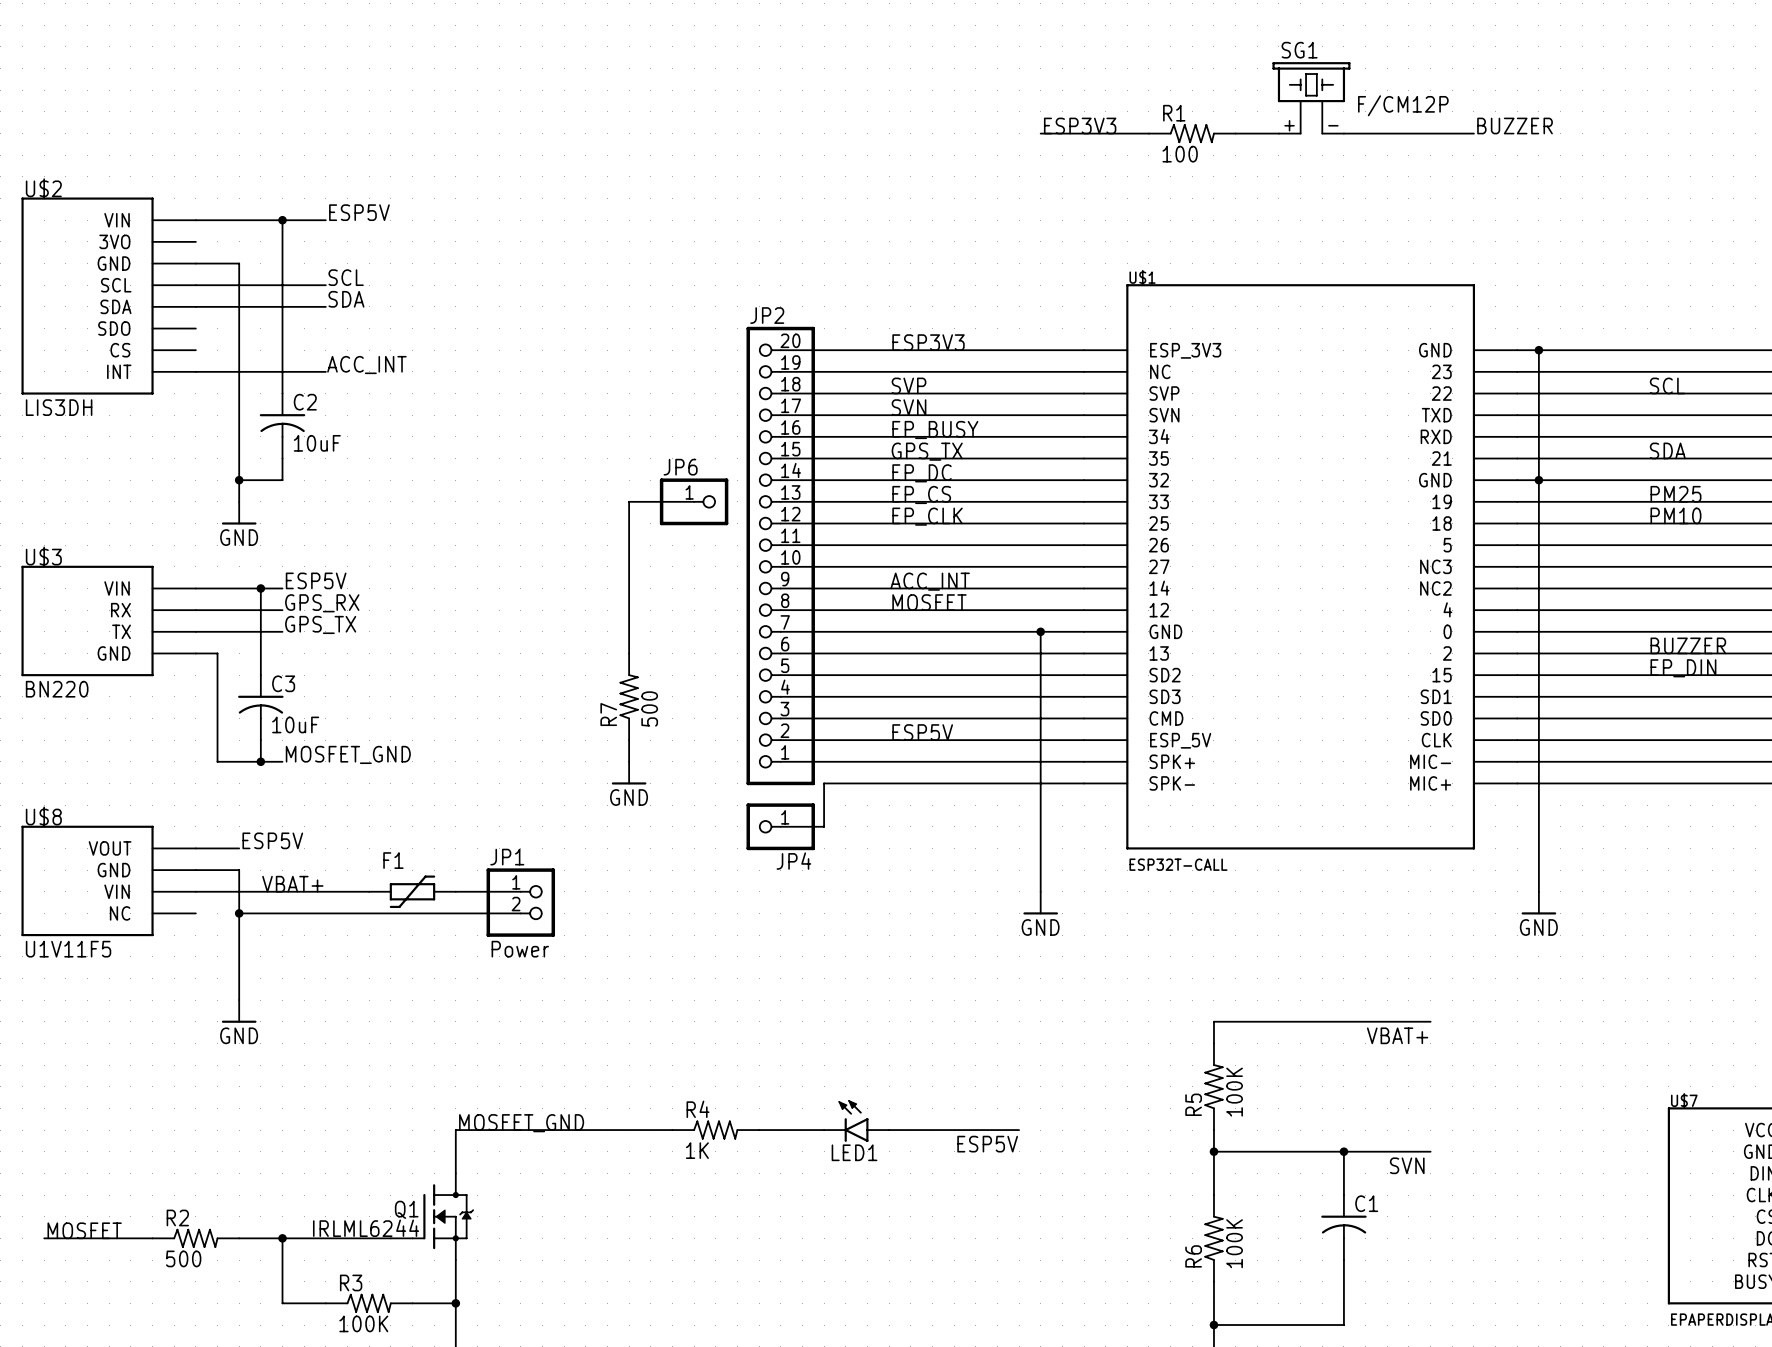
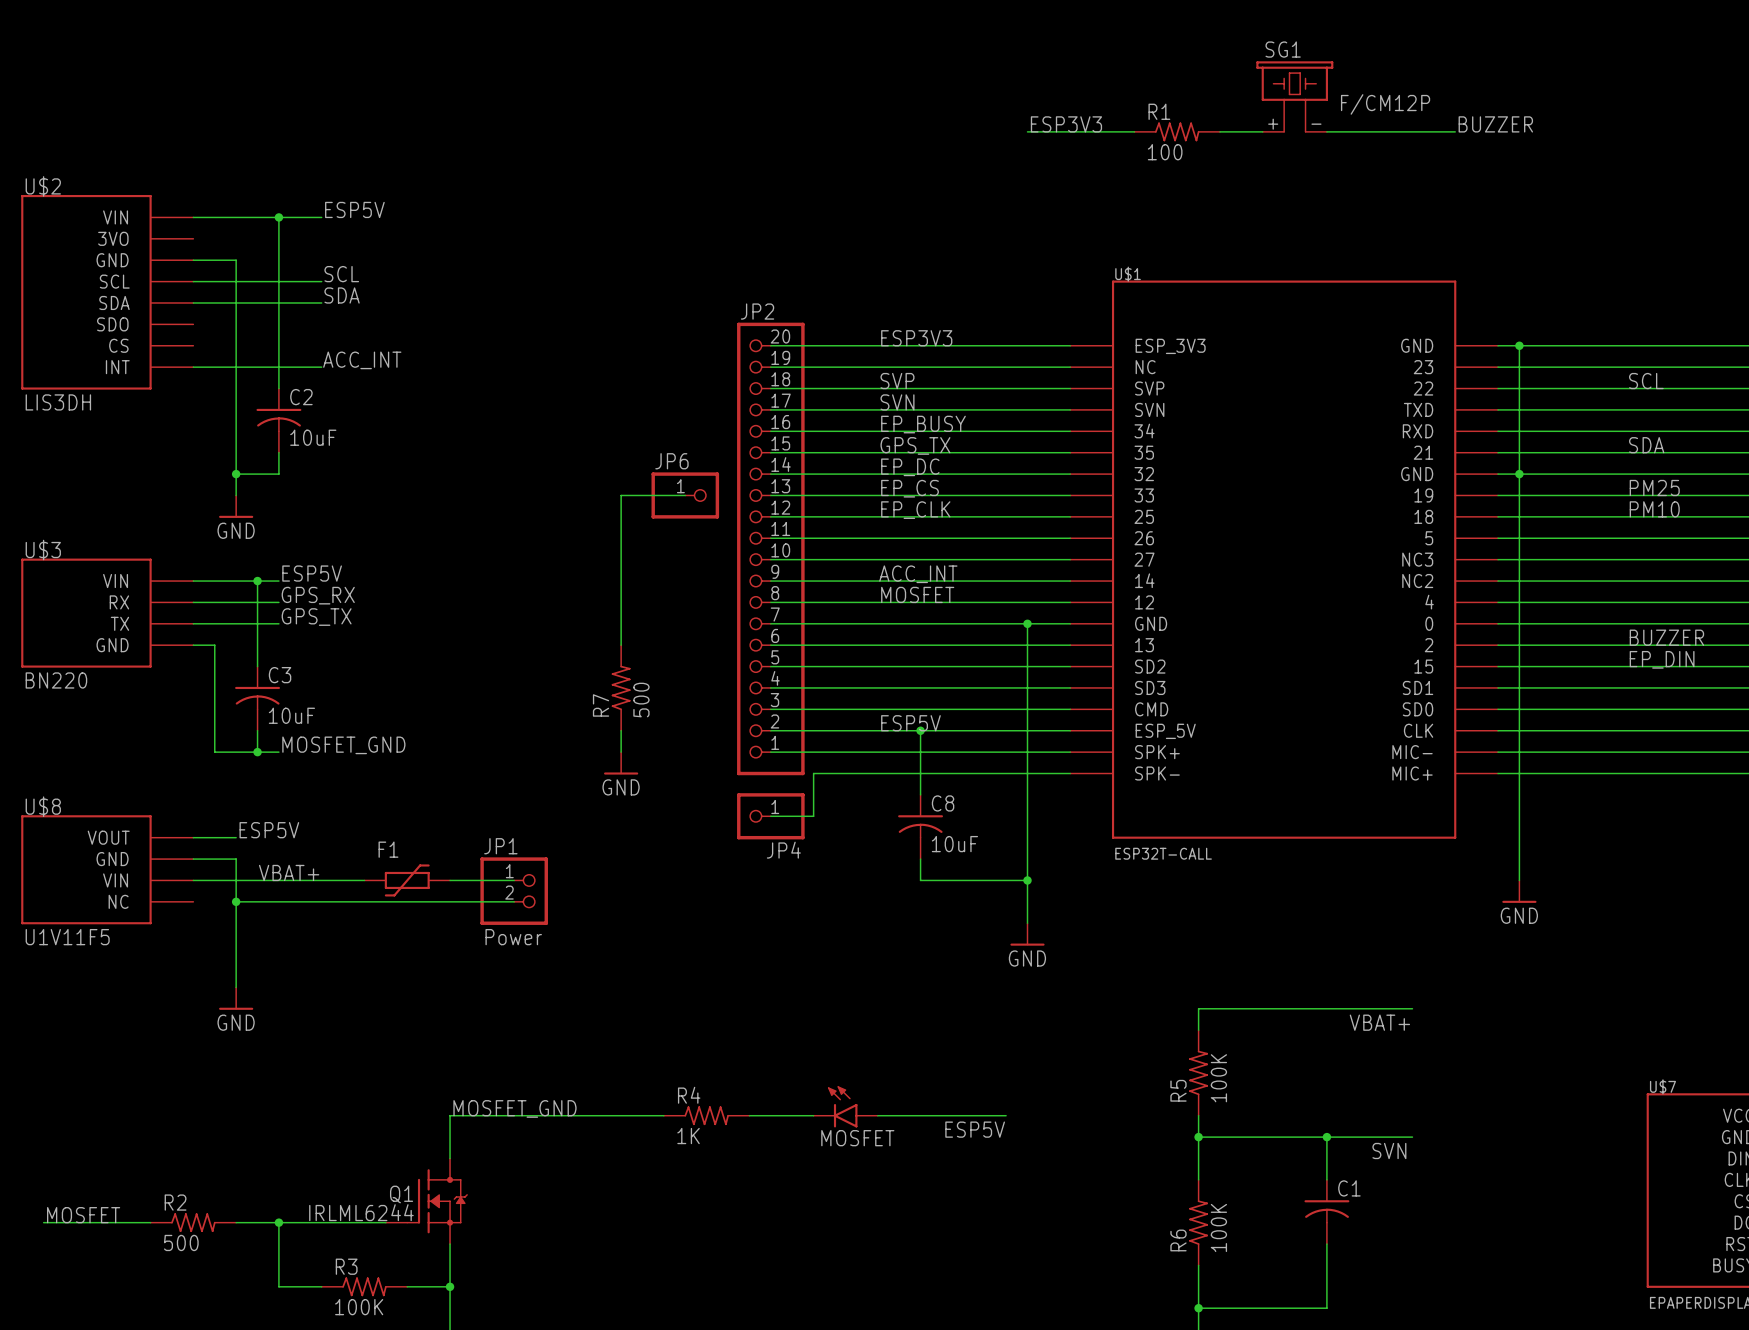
wire: none -> (920, 730) (920, 794)
junction: none -> (920, 730)
C8: none -> 10uF (920, 826)
wire: none -> (920, 859) (920, 880) (1027, 880) (1027, 923)
junction: none -> (1027, 880)
power symbol position: GND (1040, 903) -> GND (1027, 934)
LED1 name: LED1 (854, 1152) -> MOSFET (857, 1138)

